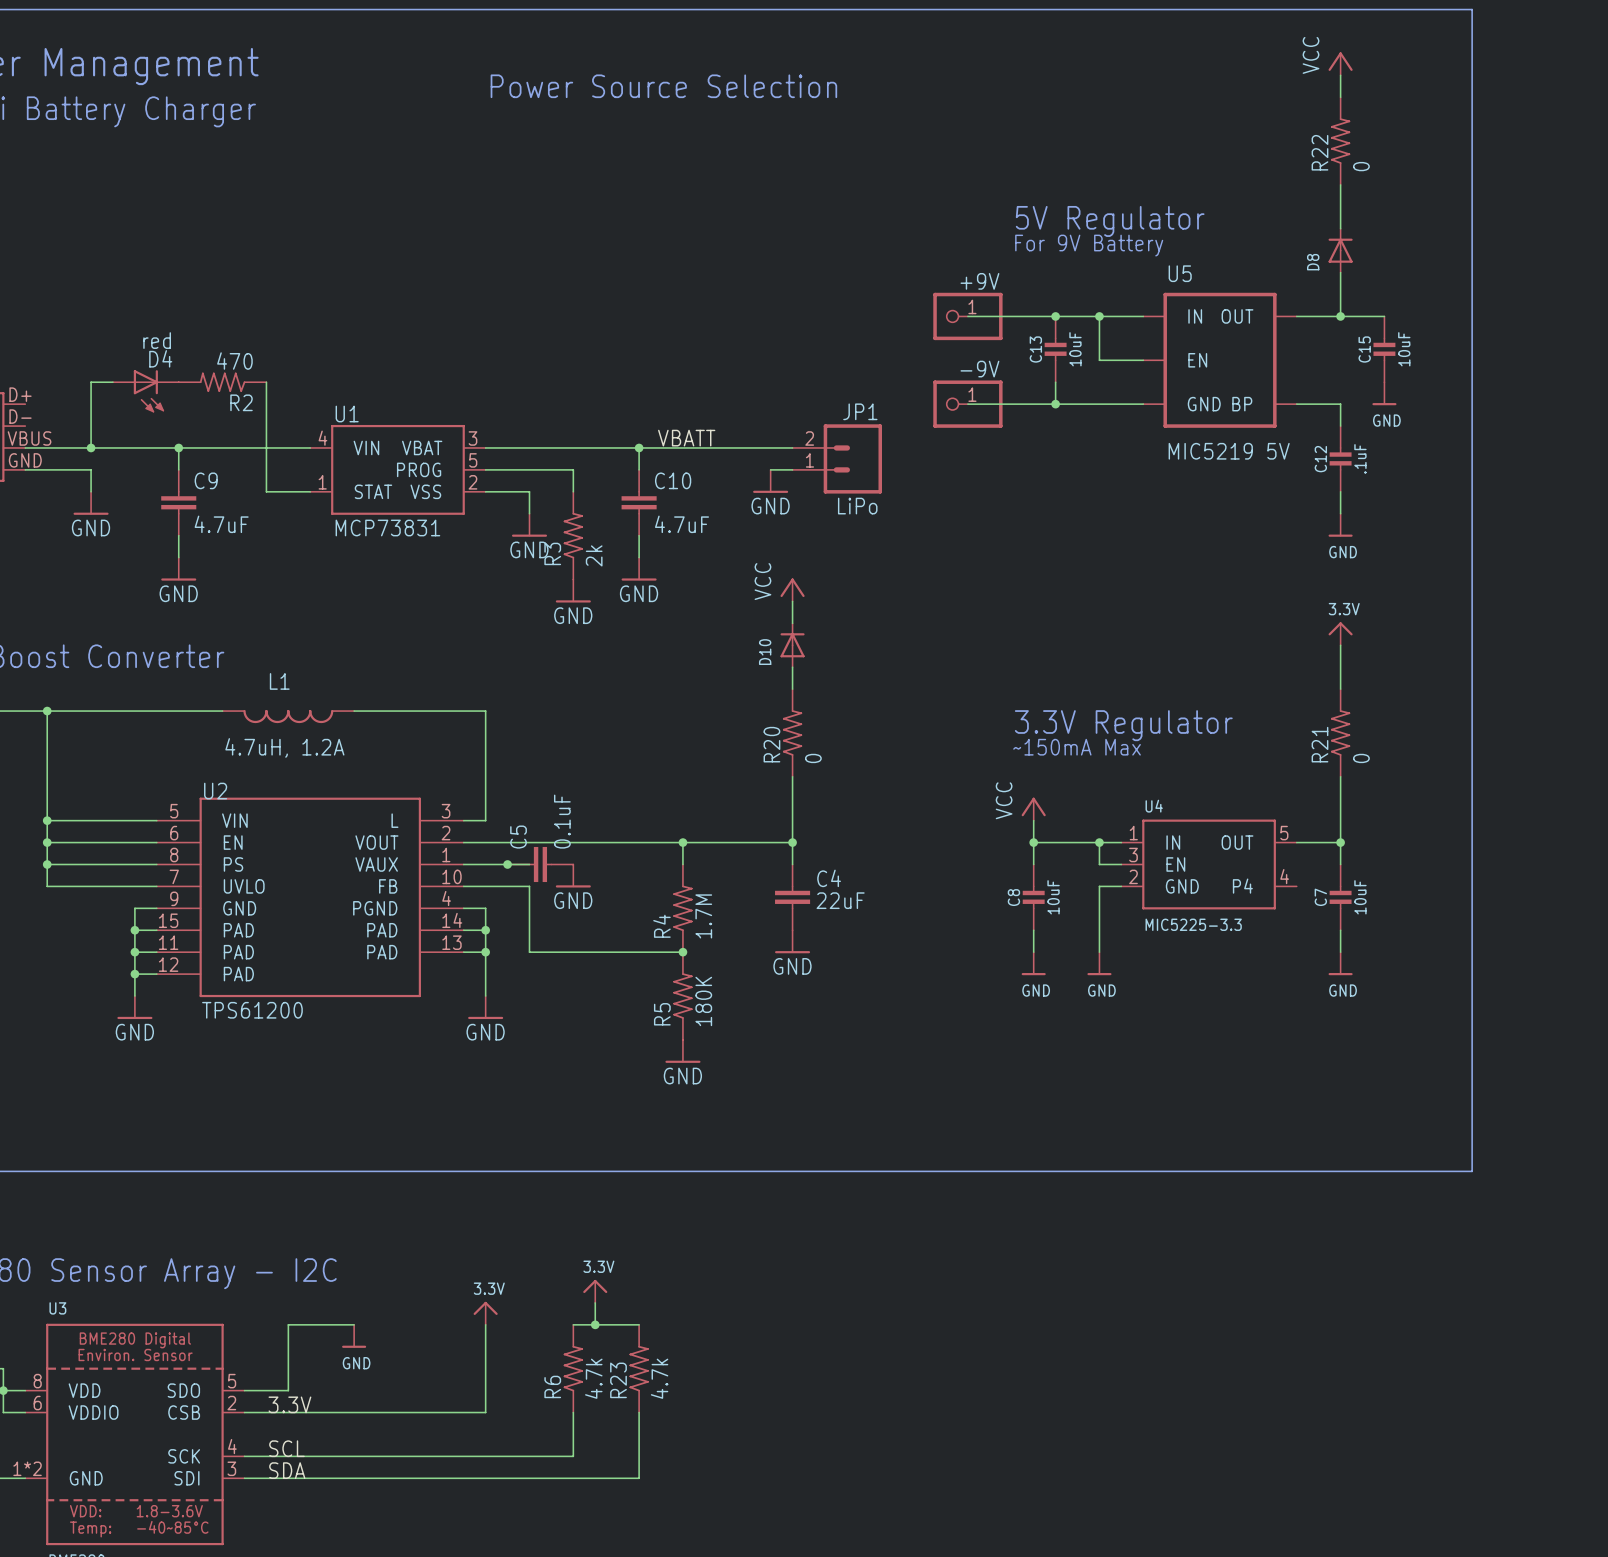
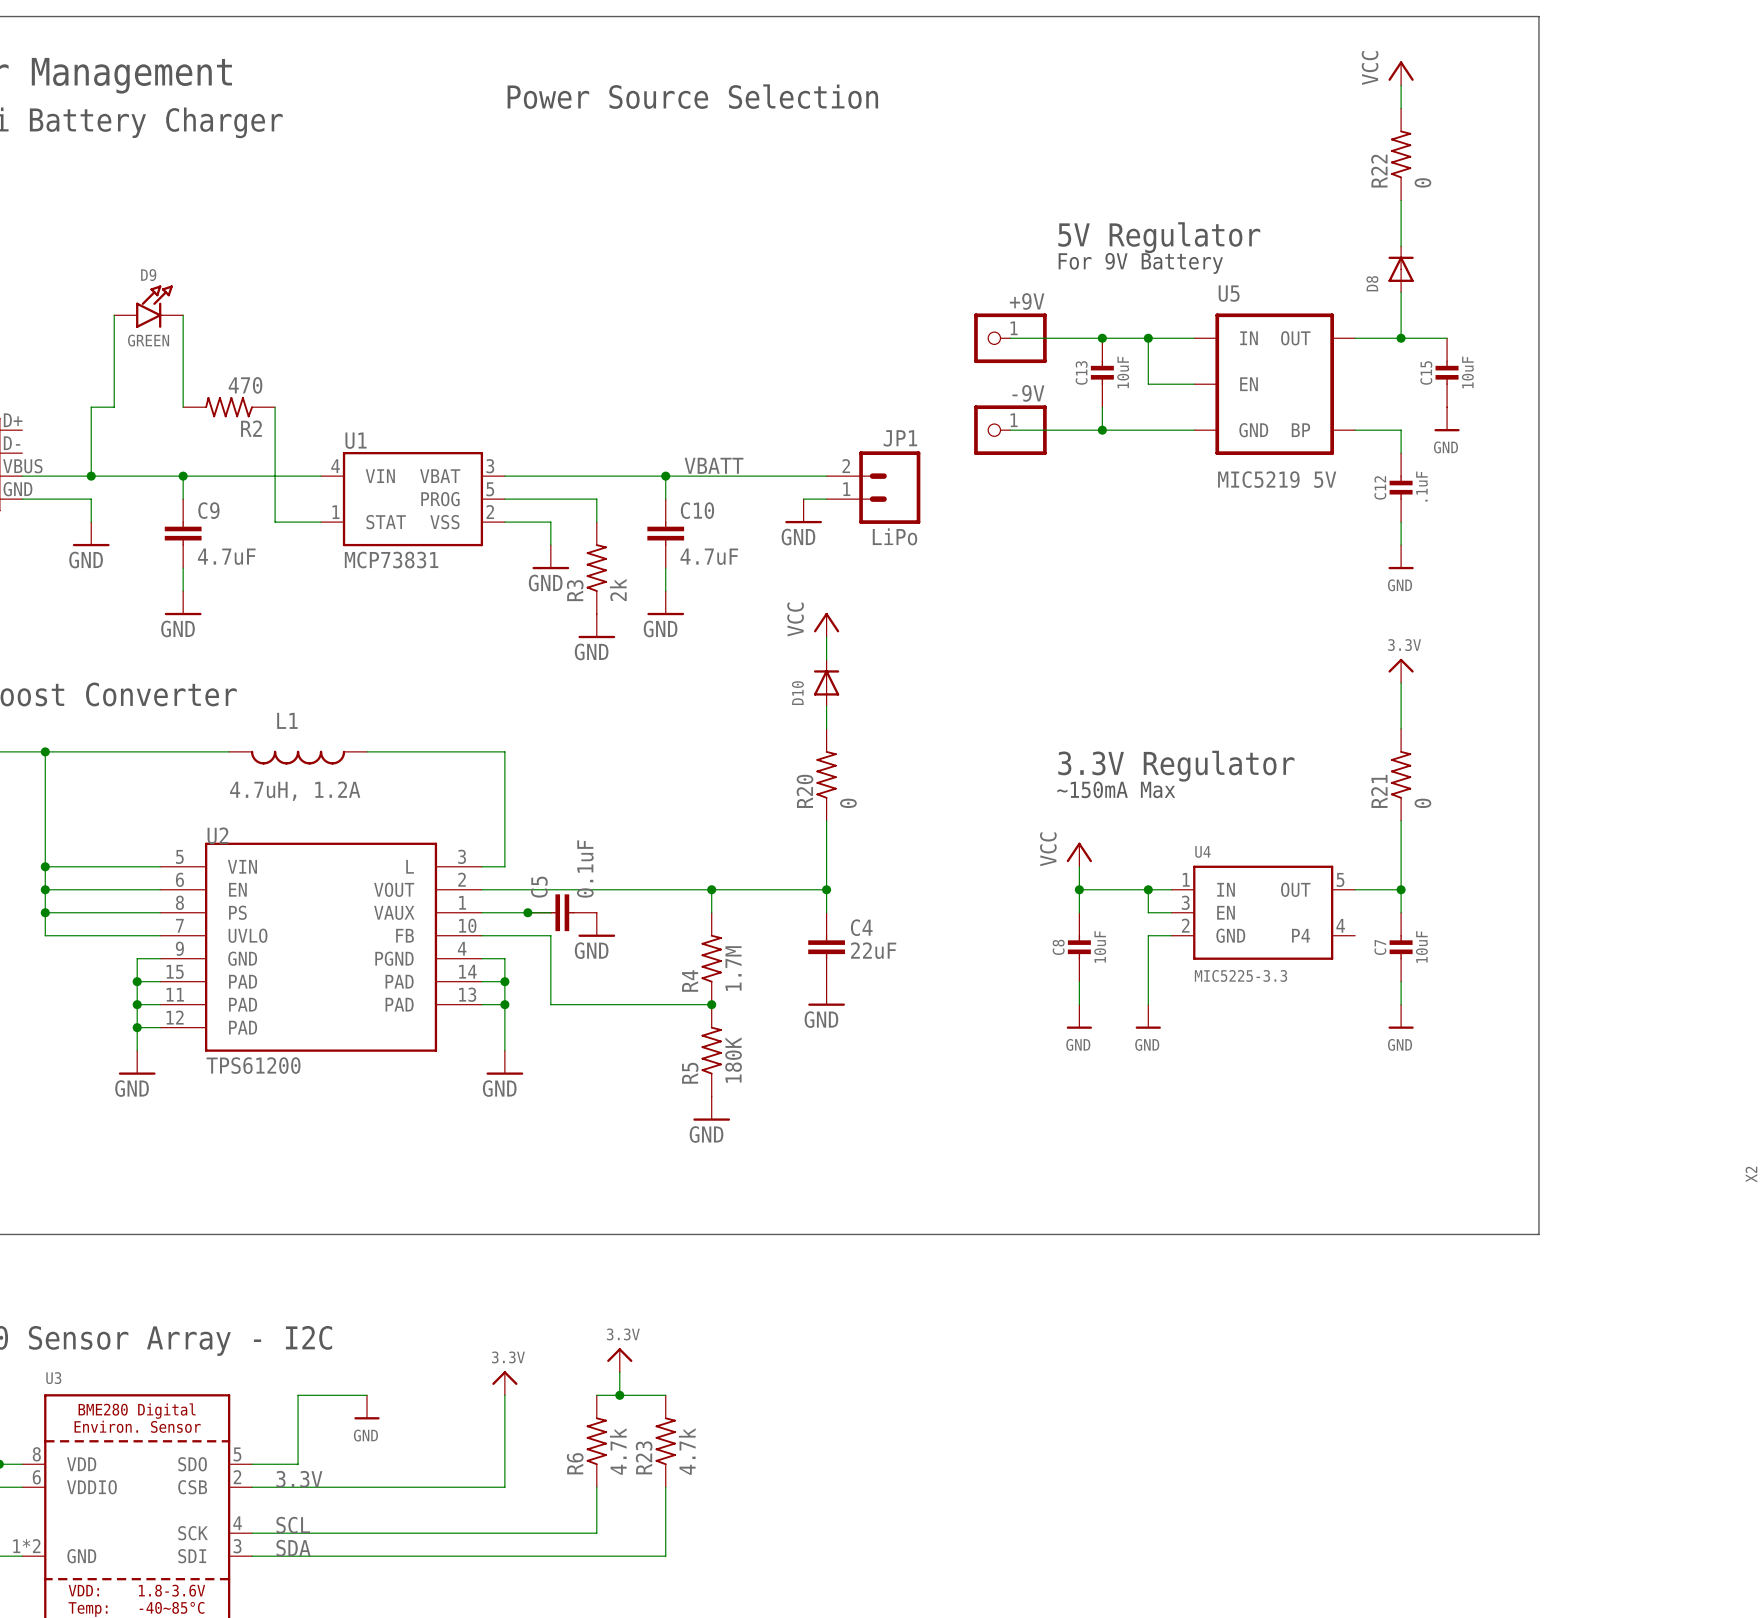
D9: none -> GREEN (148, 306)
wire: none -> (114, 315) (114, 407)
wire: none -> (183, 315) (183, 407)
D4: red (145, 391) -> none

